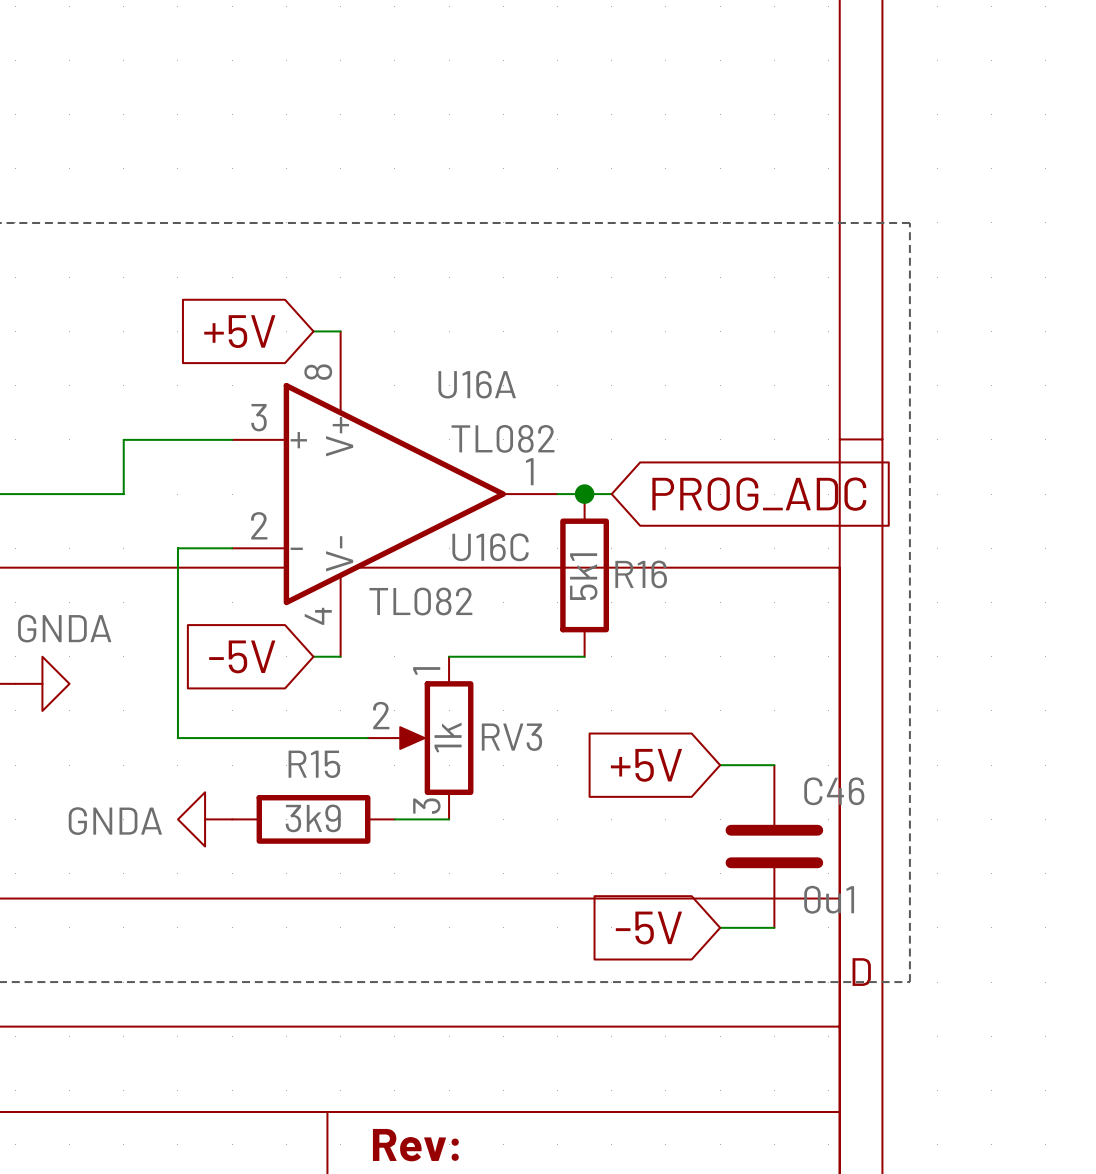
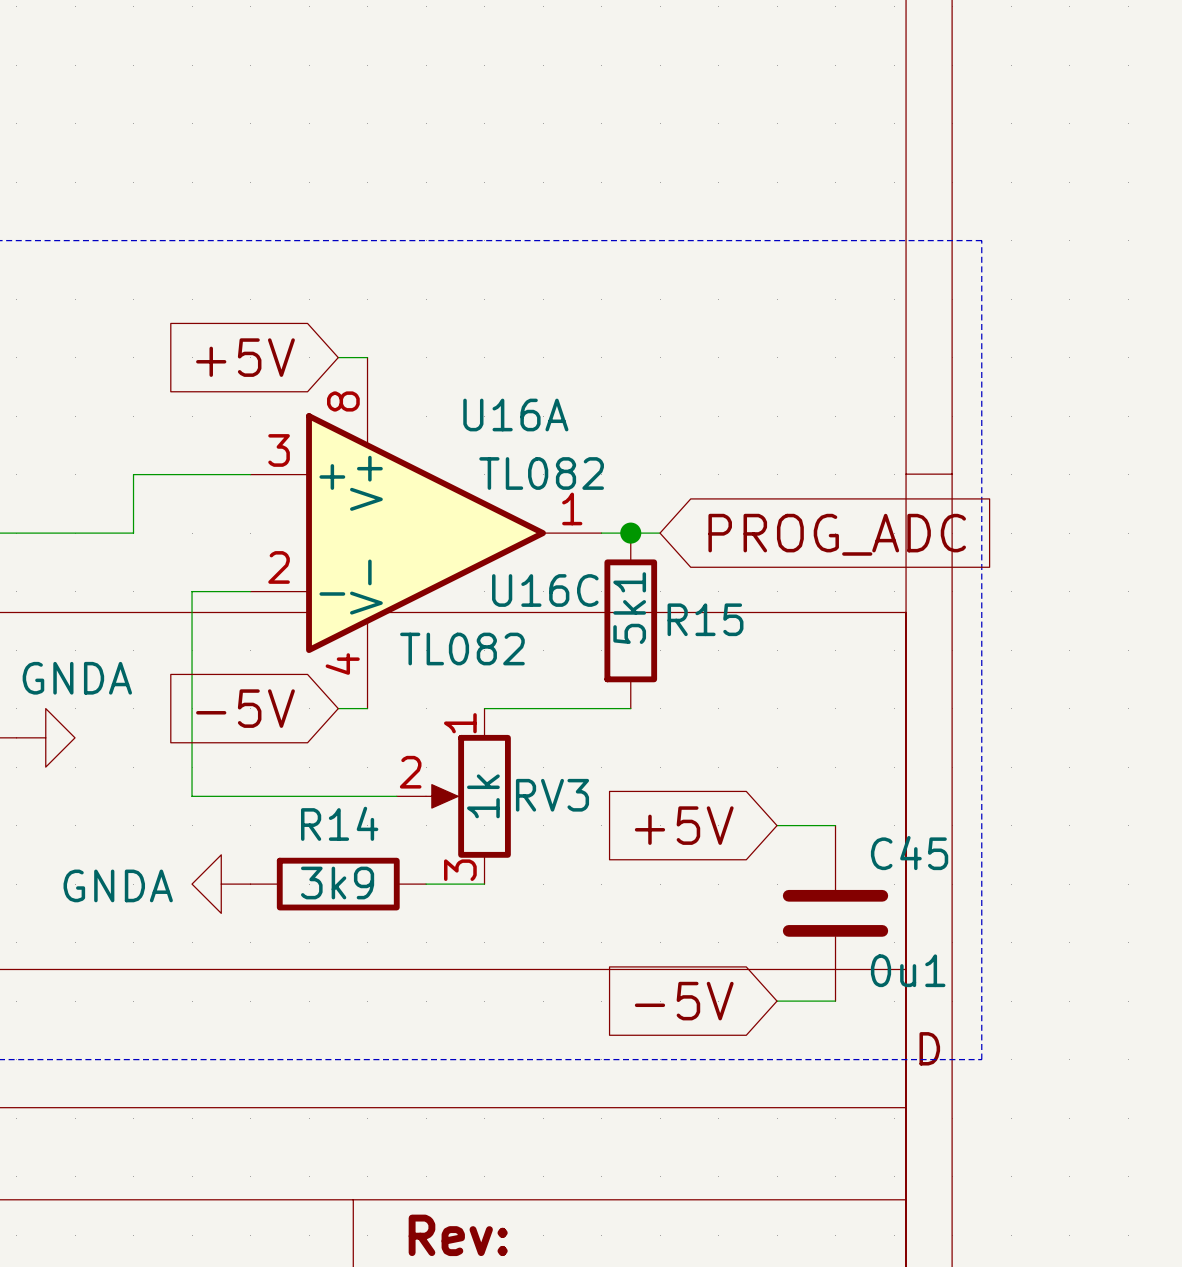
R16 name: R16 (641, 574) -> R15 (705, 619)
R15 name: R15 (314, 764) -> R14 (339, 823)
C46 name: C46 (834, 791) -> C45 (909, 853)

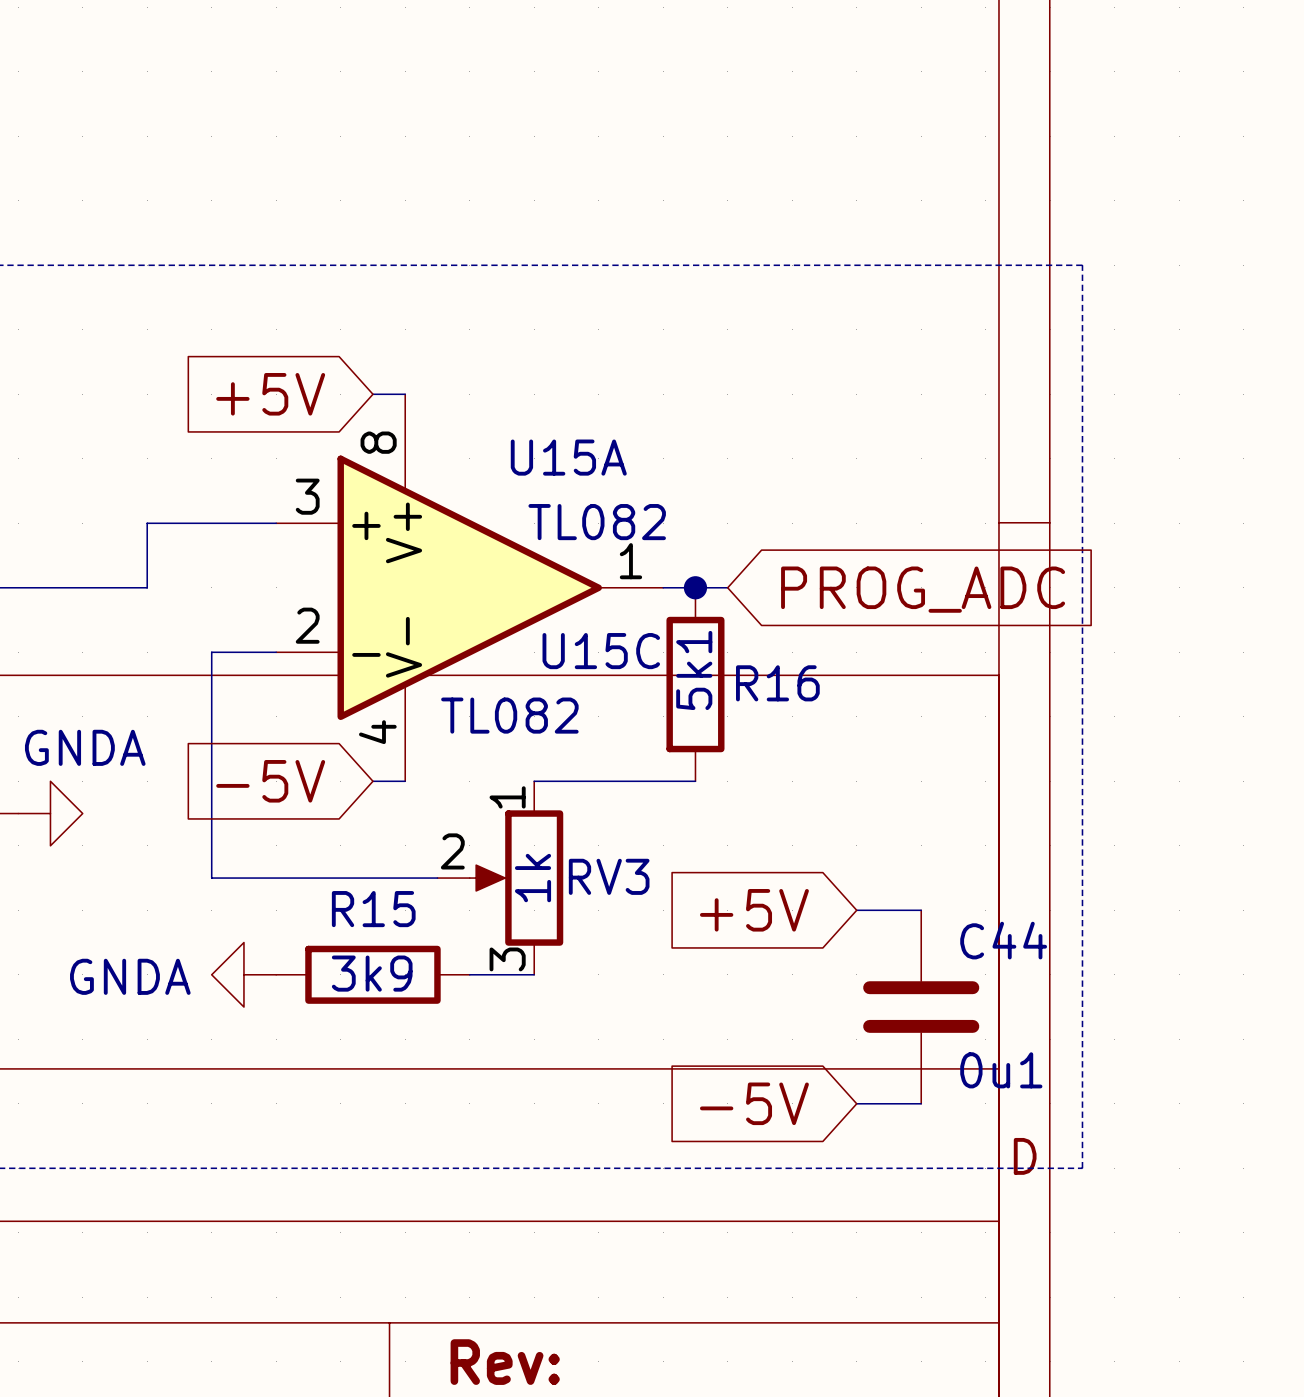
U16A name: U16A (515, 415) -> U15A (568, 457)
U16C name: U16C (545, 590) -> U15C (601, 651)
R15 name: R15 (705, 619) -> R16 (777, 683)
R14 name: R14 (339, 823) -> R15 (373, 909)
C45 name: C45 (909, 853) -> C44 (1003, 940)

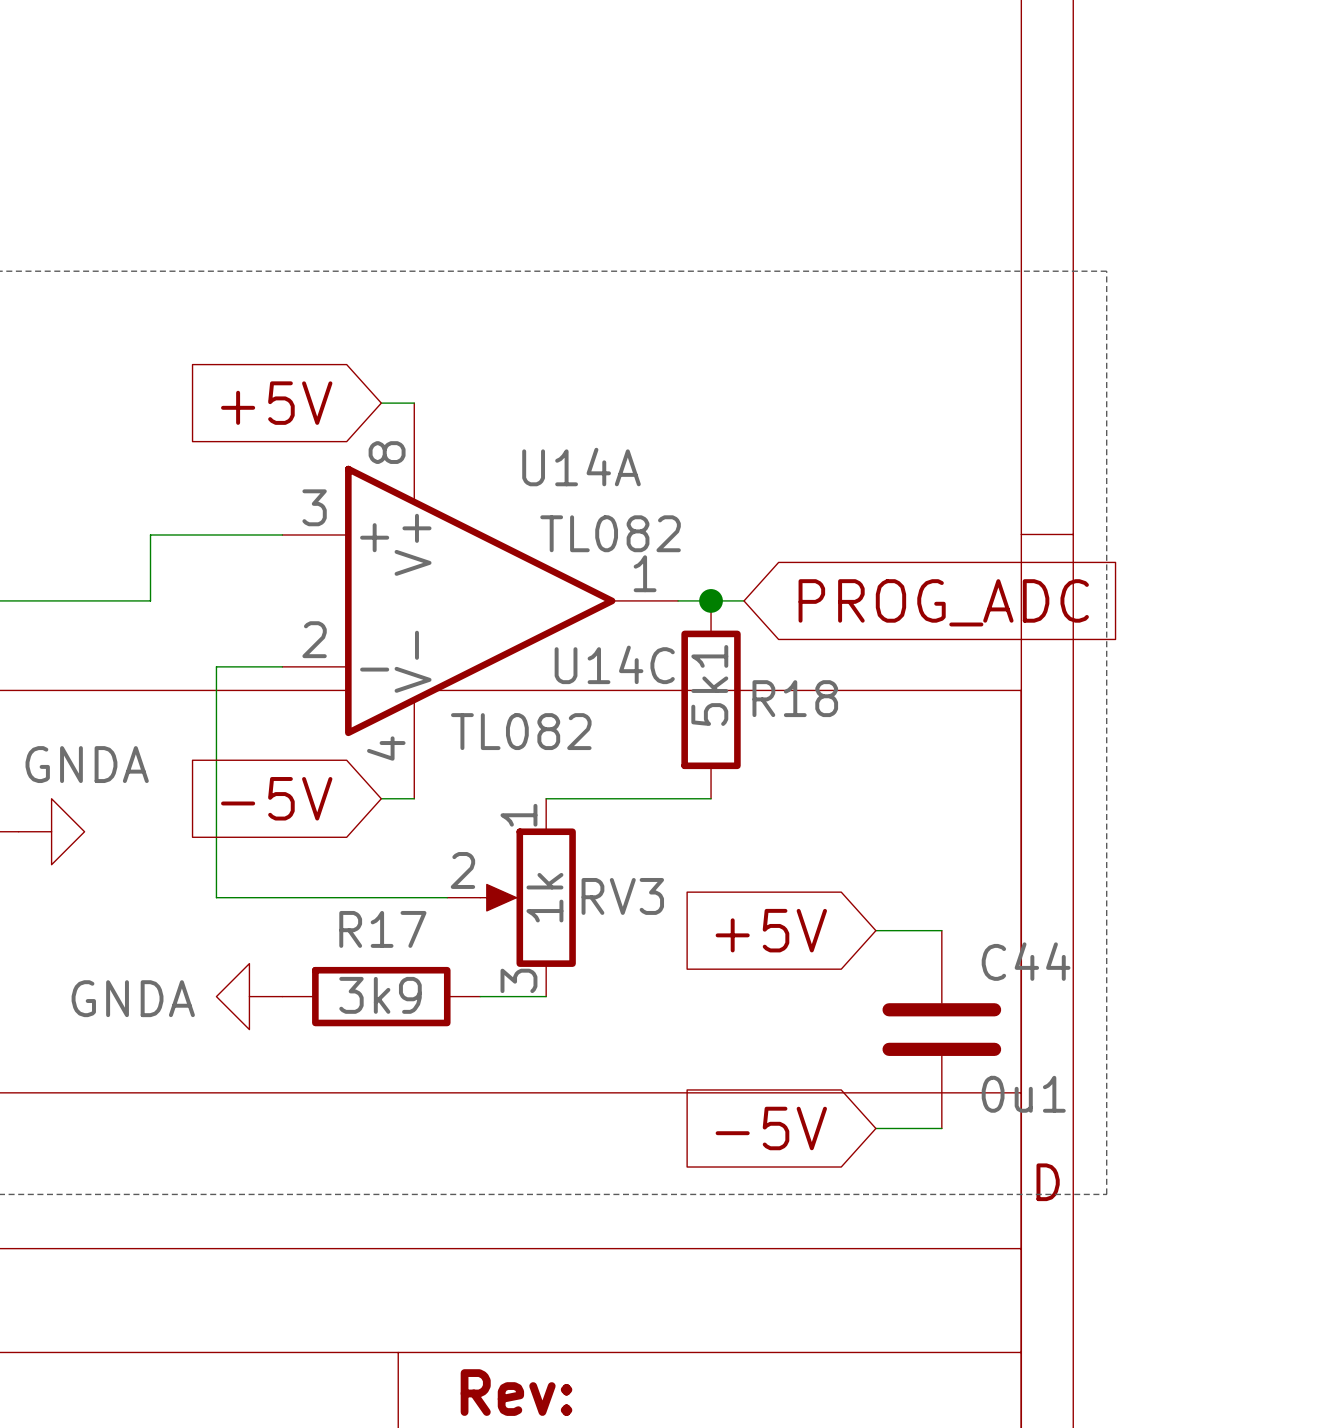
U15A name: U15A (568, 457) -> U14A (581, 467)
U15C name: U15C (601, 651) -> U14C (614, 664)
R16 name: R16 (777, 683) -> R18 (795, 698)
R15 name: R15 (373, 909) -> R17 (382, 929)

